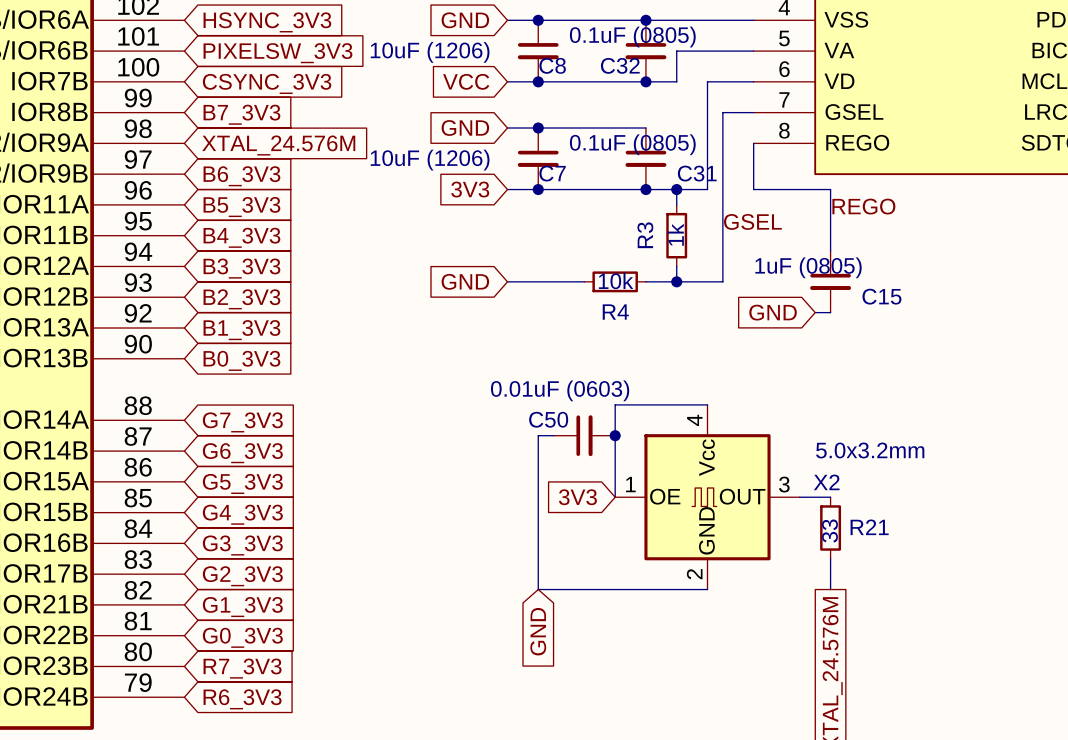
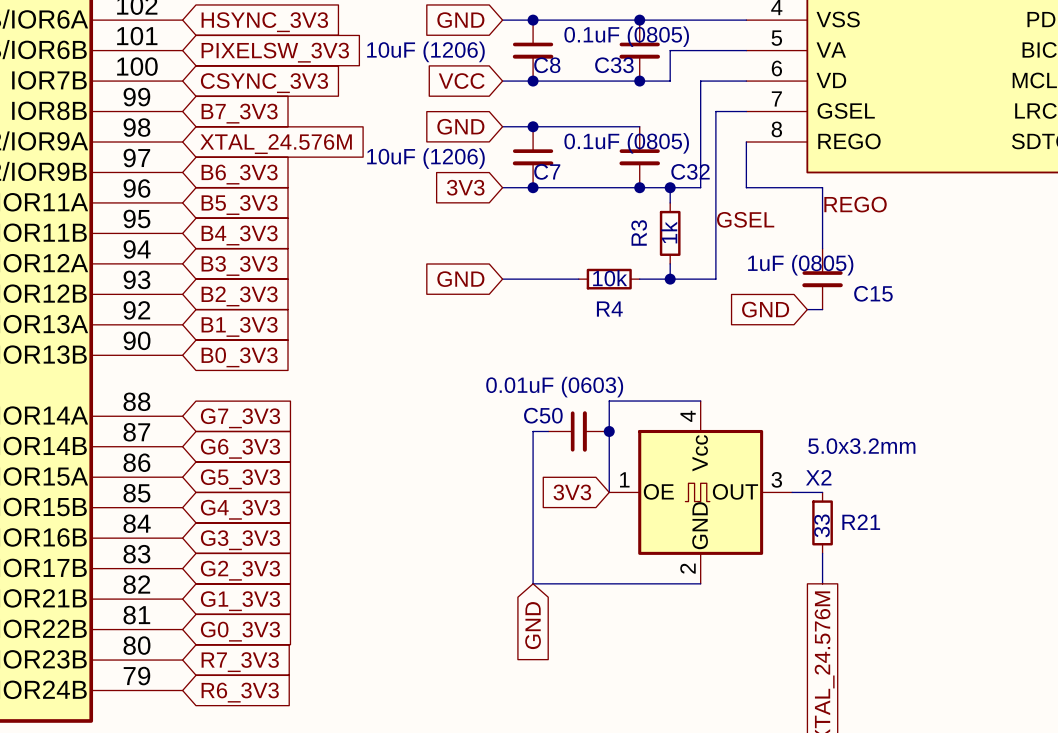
C32 name: C32 (620, 65) -> C33 (614, 65)
C31 name: C31 (697, 173) -> C32 (690, 171)

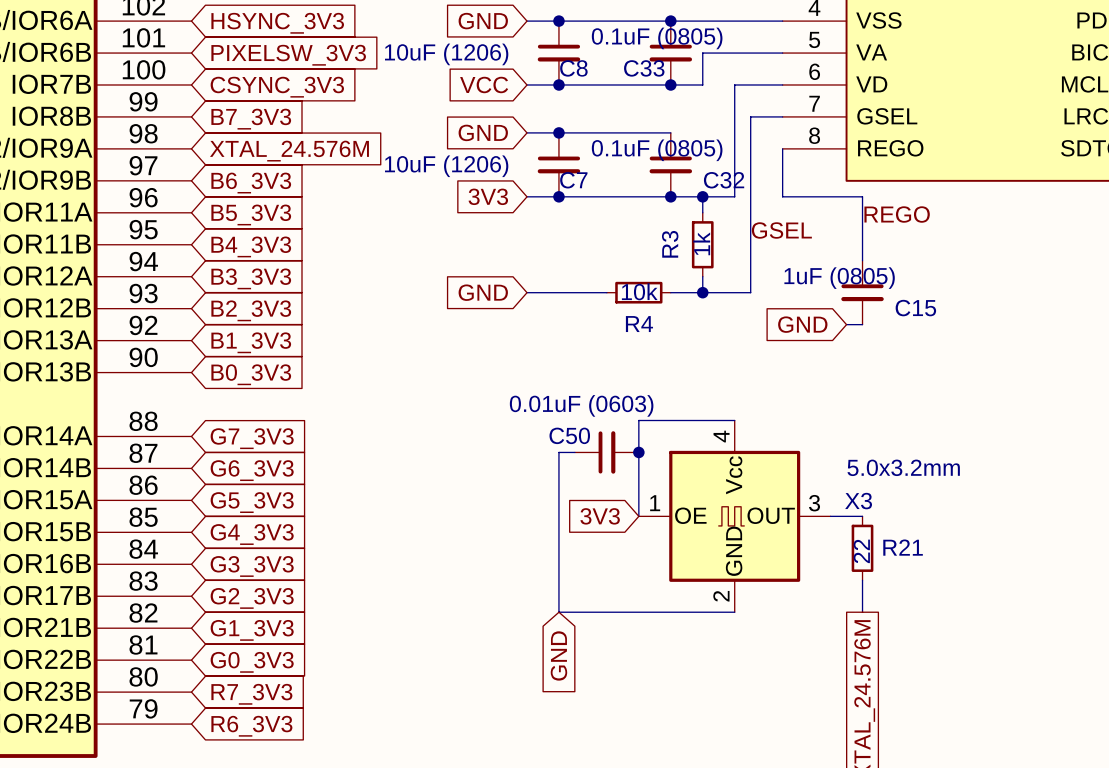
X2 name: X2 (818, 477) -> X3 (858, 501)
R21 value: 33 (821, 525) -> 22 (861, 551)

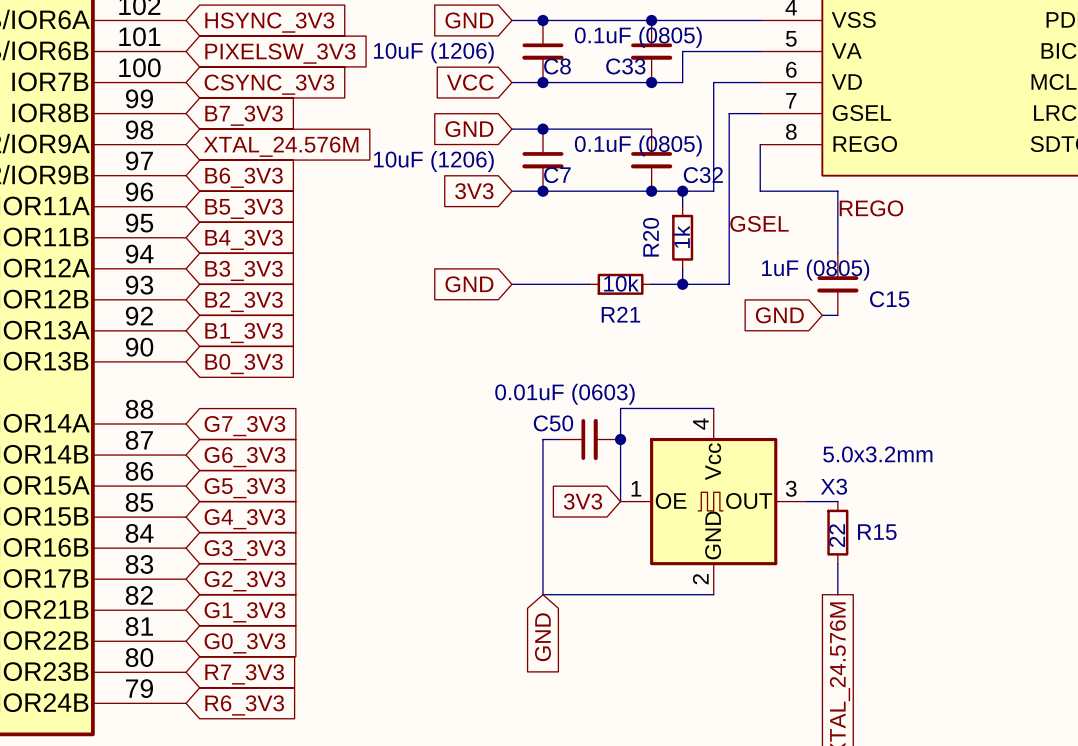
R3 name: R3 (670, 244) -> R20 (651, 237)
R4 name: R4 (639, 324) -> R21 (620, 314)
R21 name: R21 (903, 547) -> R15 (877, 532)

